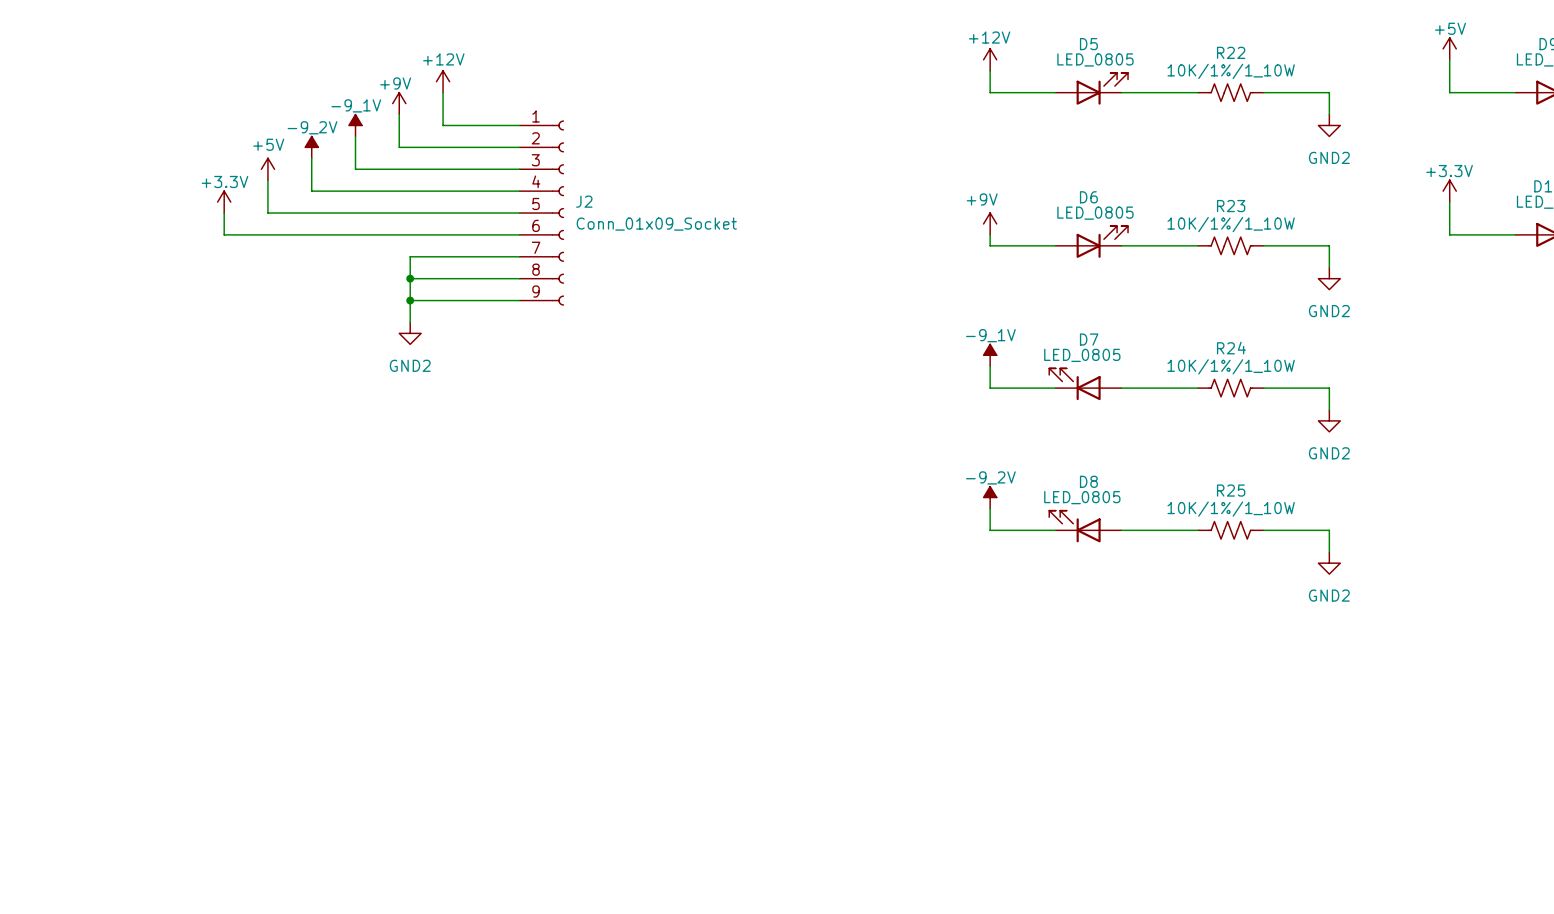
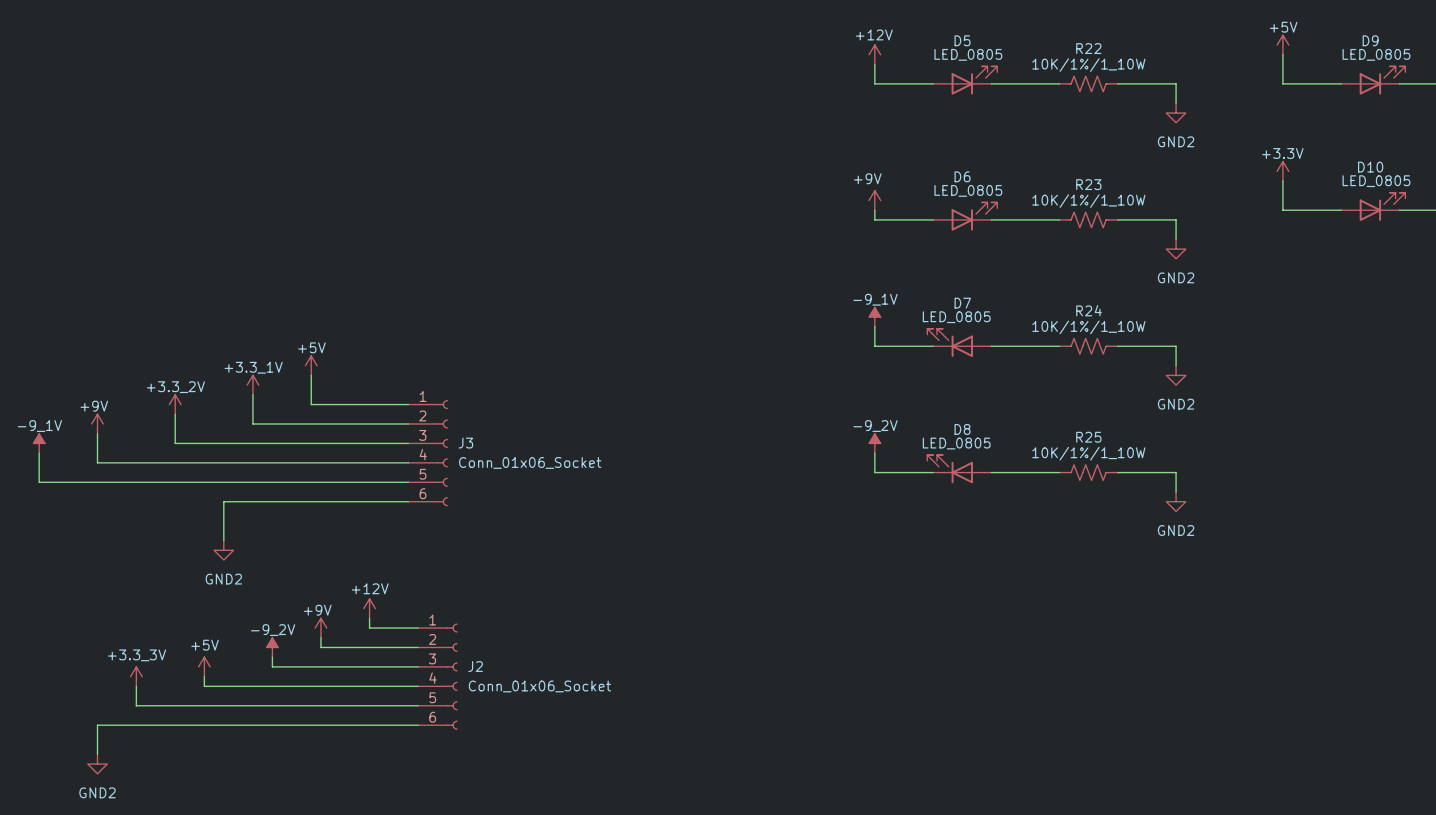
power symbol: +12V (443, 81) -> none
wire: (443, 92) (443, 125) (519, 125) -> none
power symbol: +9V (399, 103) -> none
wire: (399, 114) (399, 147) (519, 147) -> none
J2 symbol: [519, 120, 565, 306] -> [418, 623, 458, 730]
power symbol: -9_1V (355, 125) -> none
wire: (355, 136) (355, 169) (519, 169) -> none
power symbol: -9_2V (311, 147) -> none
wire: (311, 158) (311, 191) (519, 191) -> none
power symbol: +5V (267, 169) -> none
wire: (267, 180) (267, 213) (519, 213) -> none
power symbol: +3.3V (224, 202) -> none
wire: (224, 213) (224, 234) (519, 234) -> none
J2 value: Conn_01x09_Socket (656, 224) -> Conn_01x06_Socket (539, 686)
wire: (519, 256) (410, 256) (410, 322) -> none
wire: (410, 278) (519, 278) -> none
junction: (410, 278) -> none
wire: (410, 300) (519, 300) -> none
junction: (410, 300) -> none
power symbol: GND2 (410, 333) -> none
power symbol: none -> +5V (311, 365)
wire: none -> (311, 375) (311, 404) (408, 404)
power symbol: none -> +3.3_1V (252, 385)
wire: none -> (252, 394) (252, 423) (408, 423)
power symbol: none -> +3.3_2V (175, 404)
wire: none -> (175, 414) (175, 443) (408, 443)
power symbol: none -> +9V (97, 423)
wire: none -> (97, 433) (97, 462) (408, 462)
power symbol: none -> -9_1V (39, 443)
wire: none -> (39, 453) (39, 482) (408, 482)
J3: none -> Conn_01x06_Socket (428, 453)
wire: none -> (408, 501) (223, 501) (223, 540)
power symbol: none -> GND2 (223, 550)
power symbol: none -> +12V (369, 608)
wire: none -> (369, 618) (369, 628) (418, 628)
power symbol: none -> +9V (320, 628)
wire: none -> (320, 637) (320, 647) (418, 647)
power symbol: none -> -9_2V (272, 647)
wire: none -> (272, 657) (272, 666) (418, 666)
power symbol: none -> +5V (204, 666)
power symbol: none -> +3.3_3V (136, 676)
wire: none -> (204, 676) (204, 686) (418, 686)
wire: none -> (136, 686) (136, 705) (418, 705)
wire: none -> (418, 725) (97, 725) (97, 754)
power symbol: none -> GND2 (97, 764)

